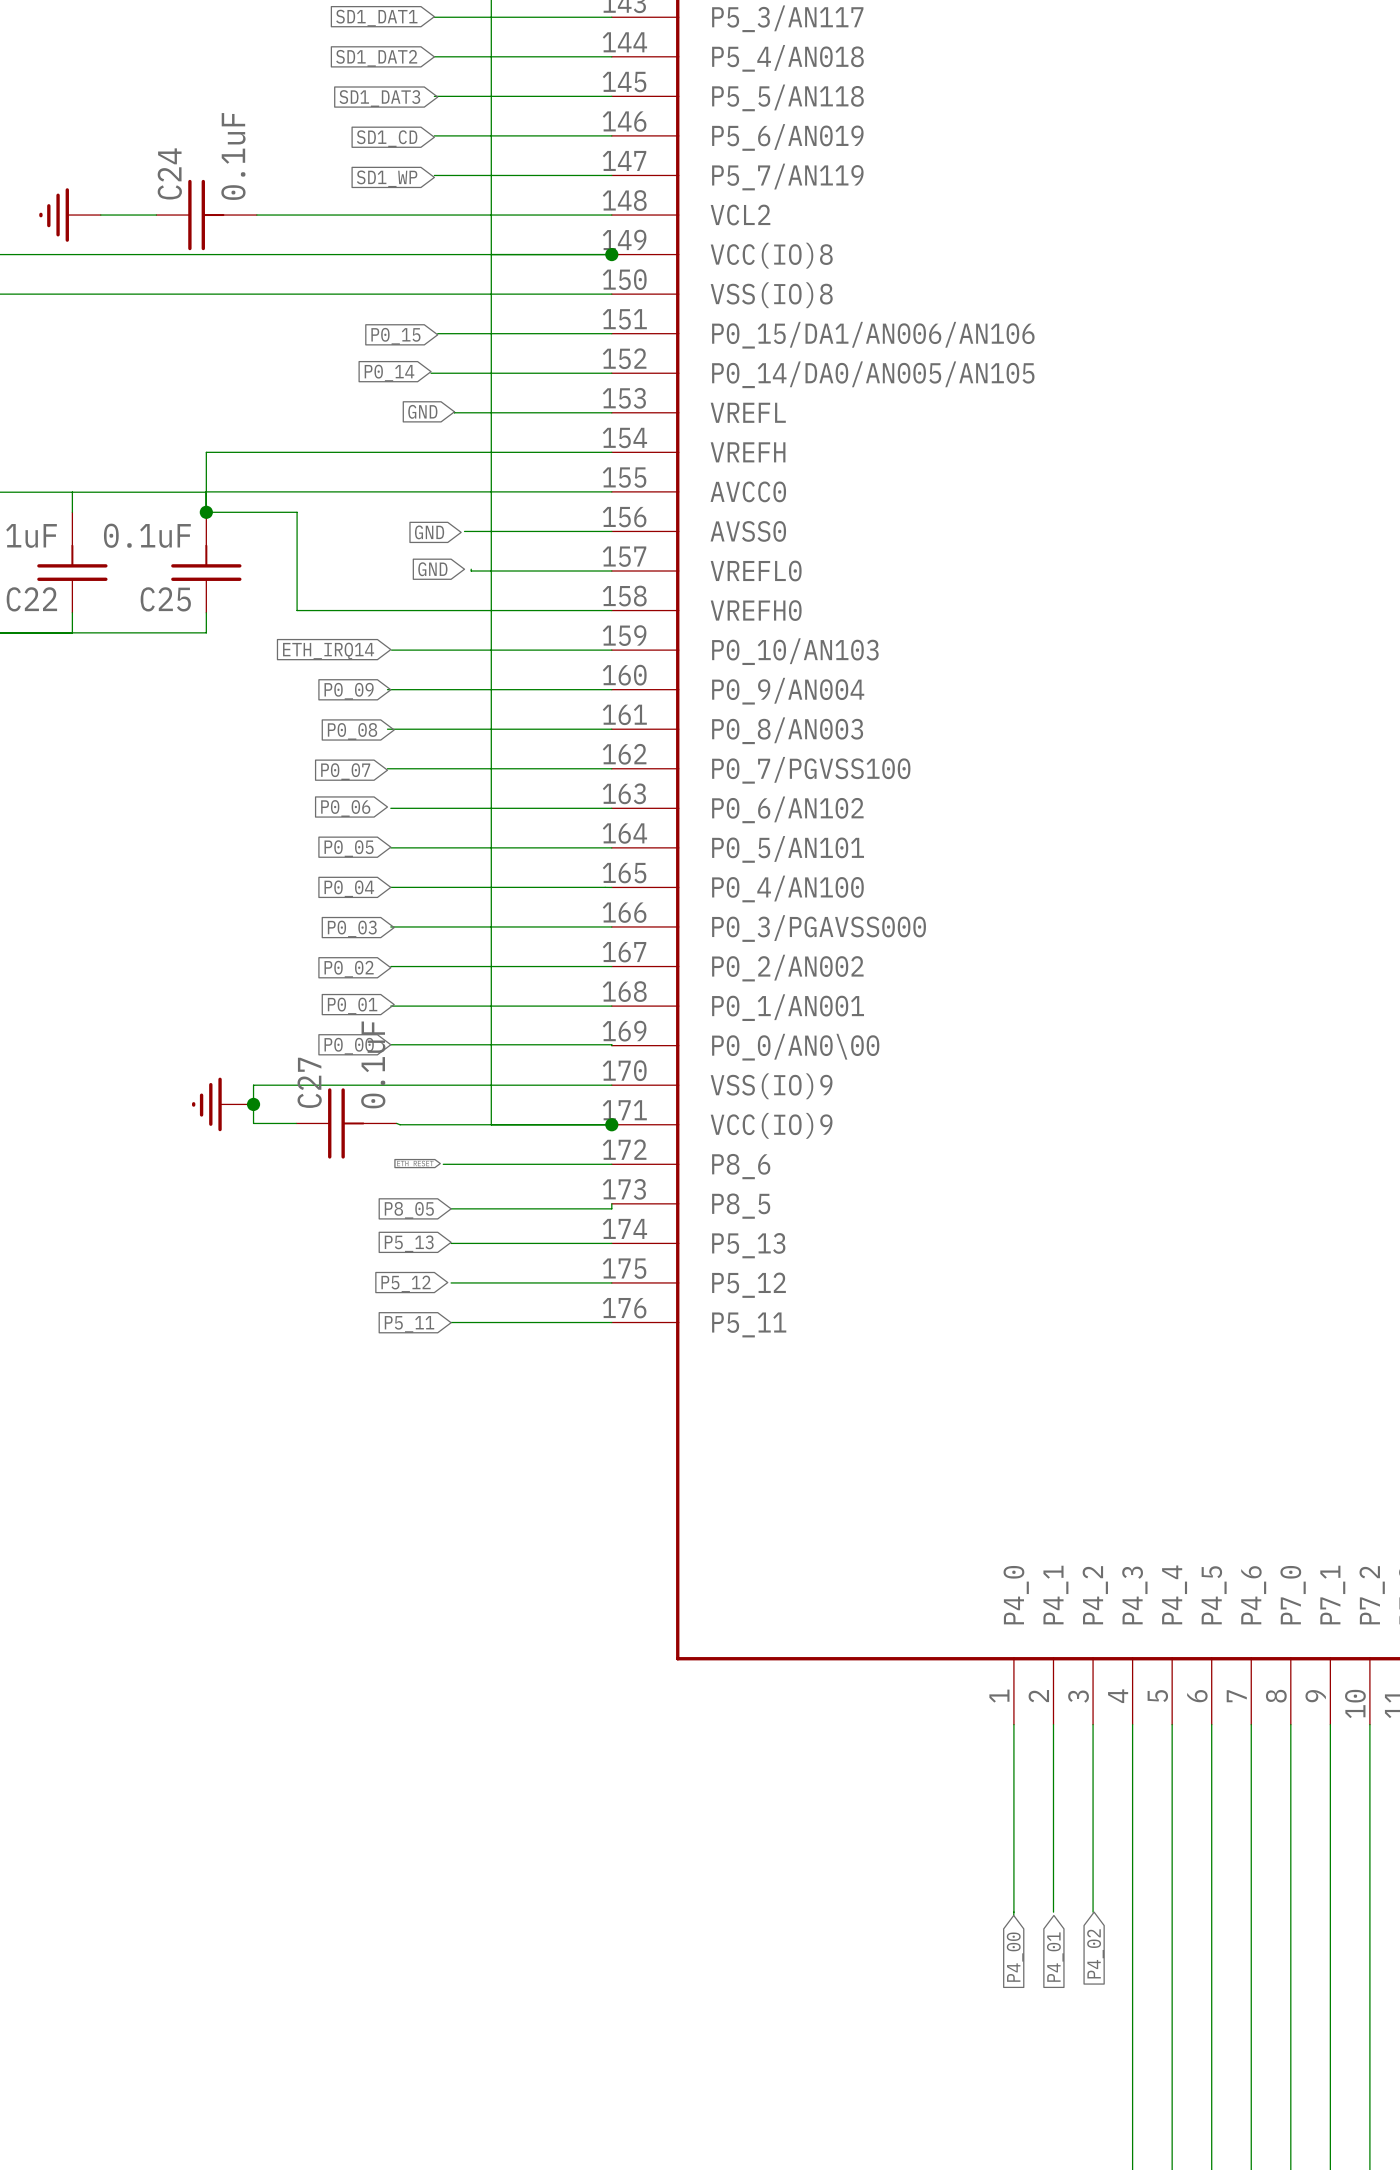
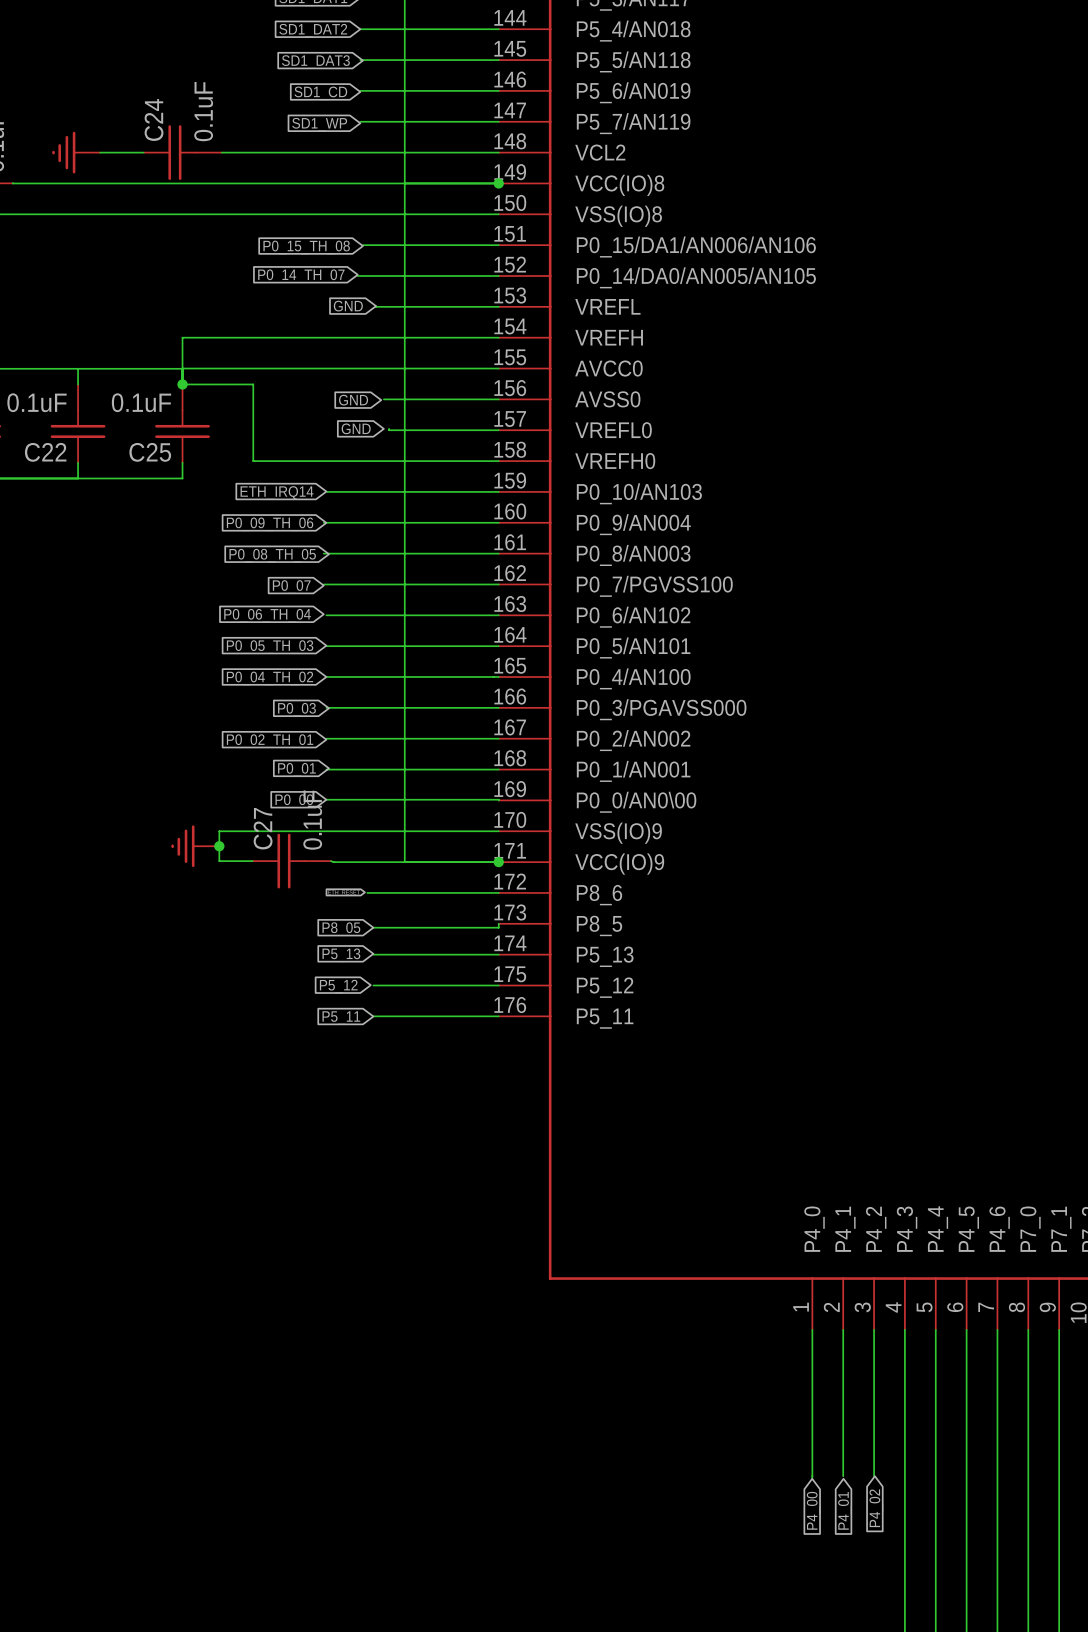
global label: P0_15 (395, 336) -> P0_15_TH_08 (306, 247)
global label: P0_14 (389, 373) -> P0_14_TH_07 (301, 276)
global label: P0_09 (349, 691) -> P0_09_TH_06 (270, 524)
global label: P0_08 (352, 731) -> P0_08_TH_05 (272, 555)
global label: P0_06 (345, 808) -> P0_06_TH_04 (267, 615)
global label: P0_05 (349, 848) -> P0_05_TH_03 (270, 647)
global label: P0_04 (349, 888) -> P0_04_TH_02 (270, 678)
global label: P0_02 (349, 969) -> P0_02_TH_01 (270, 741)

